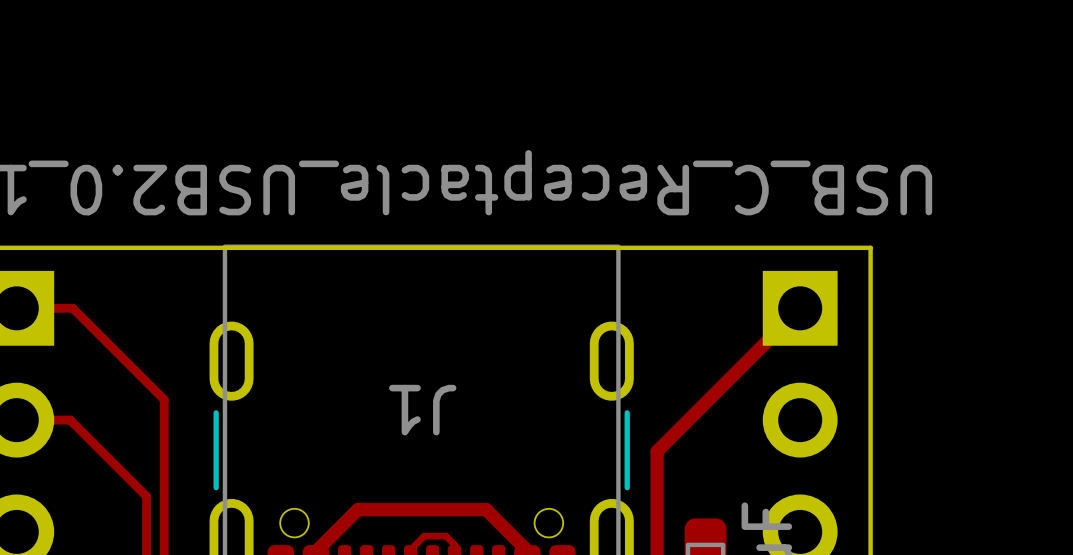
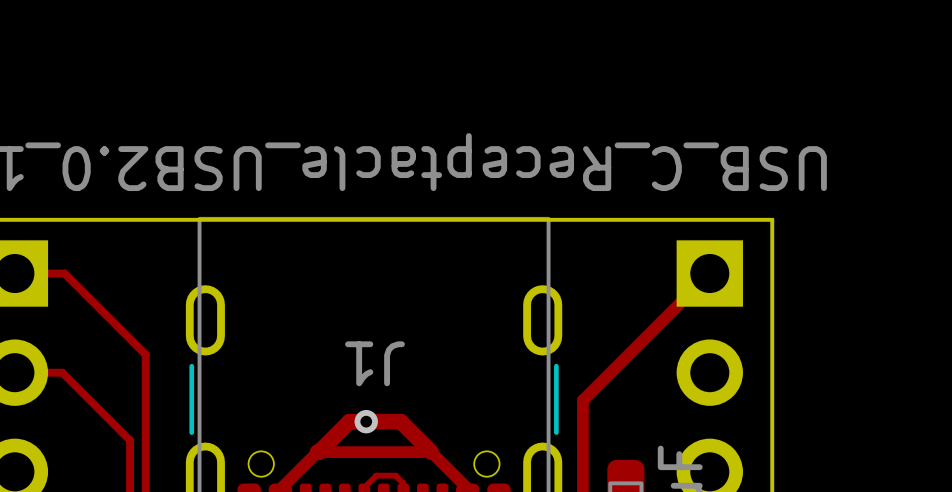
via: none -> (366, 421)
track: none -> (317, 452) (349, 421) (400, 421) (431, 452)

